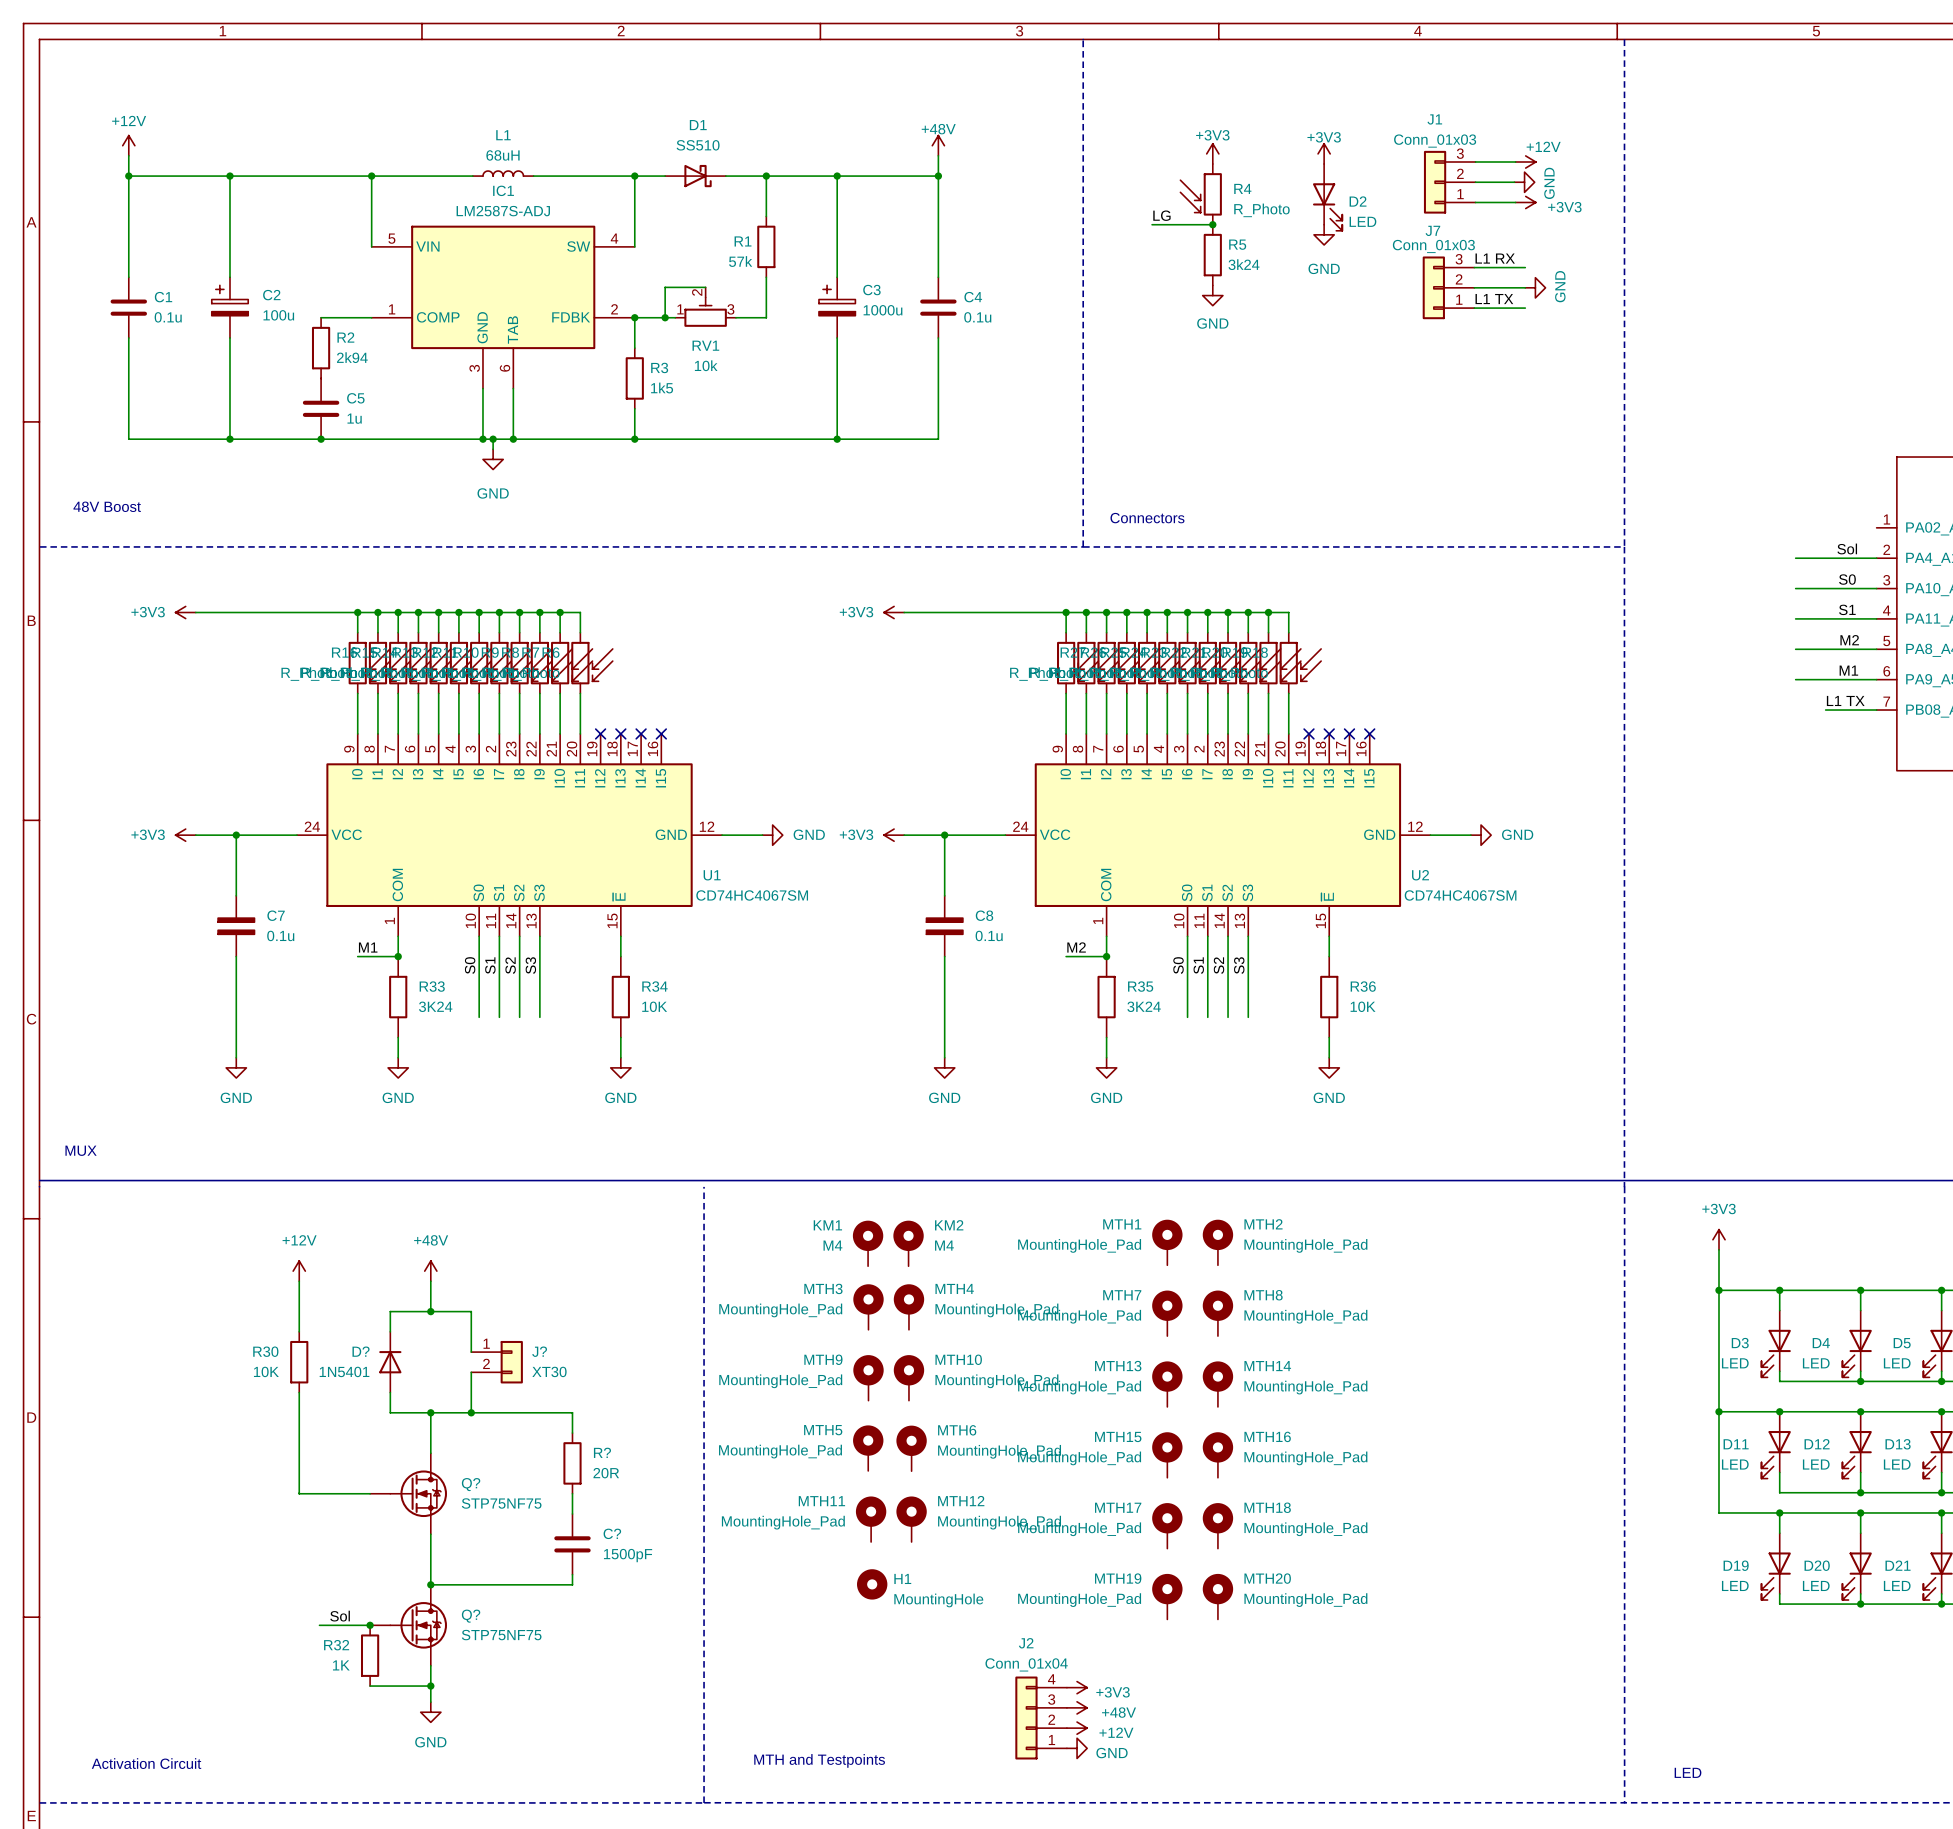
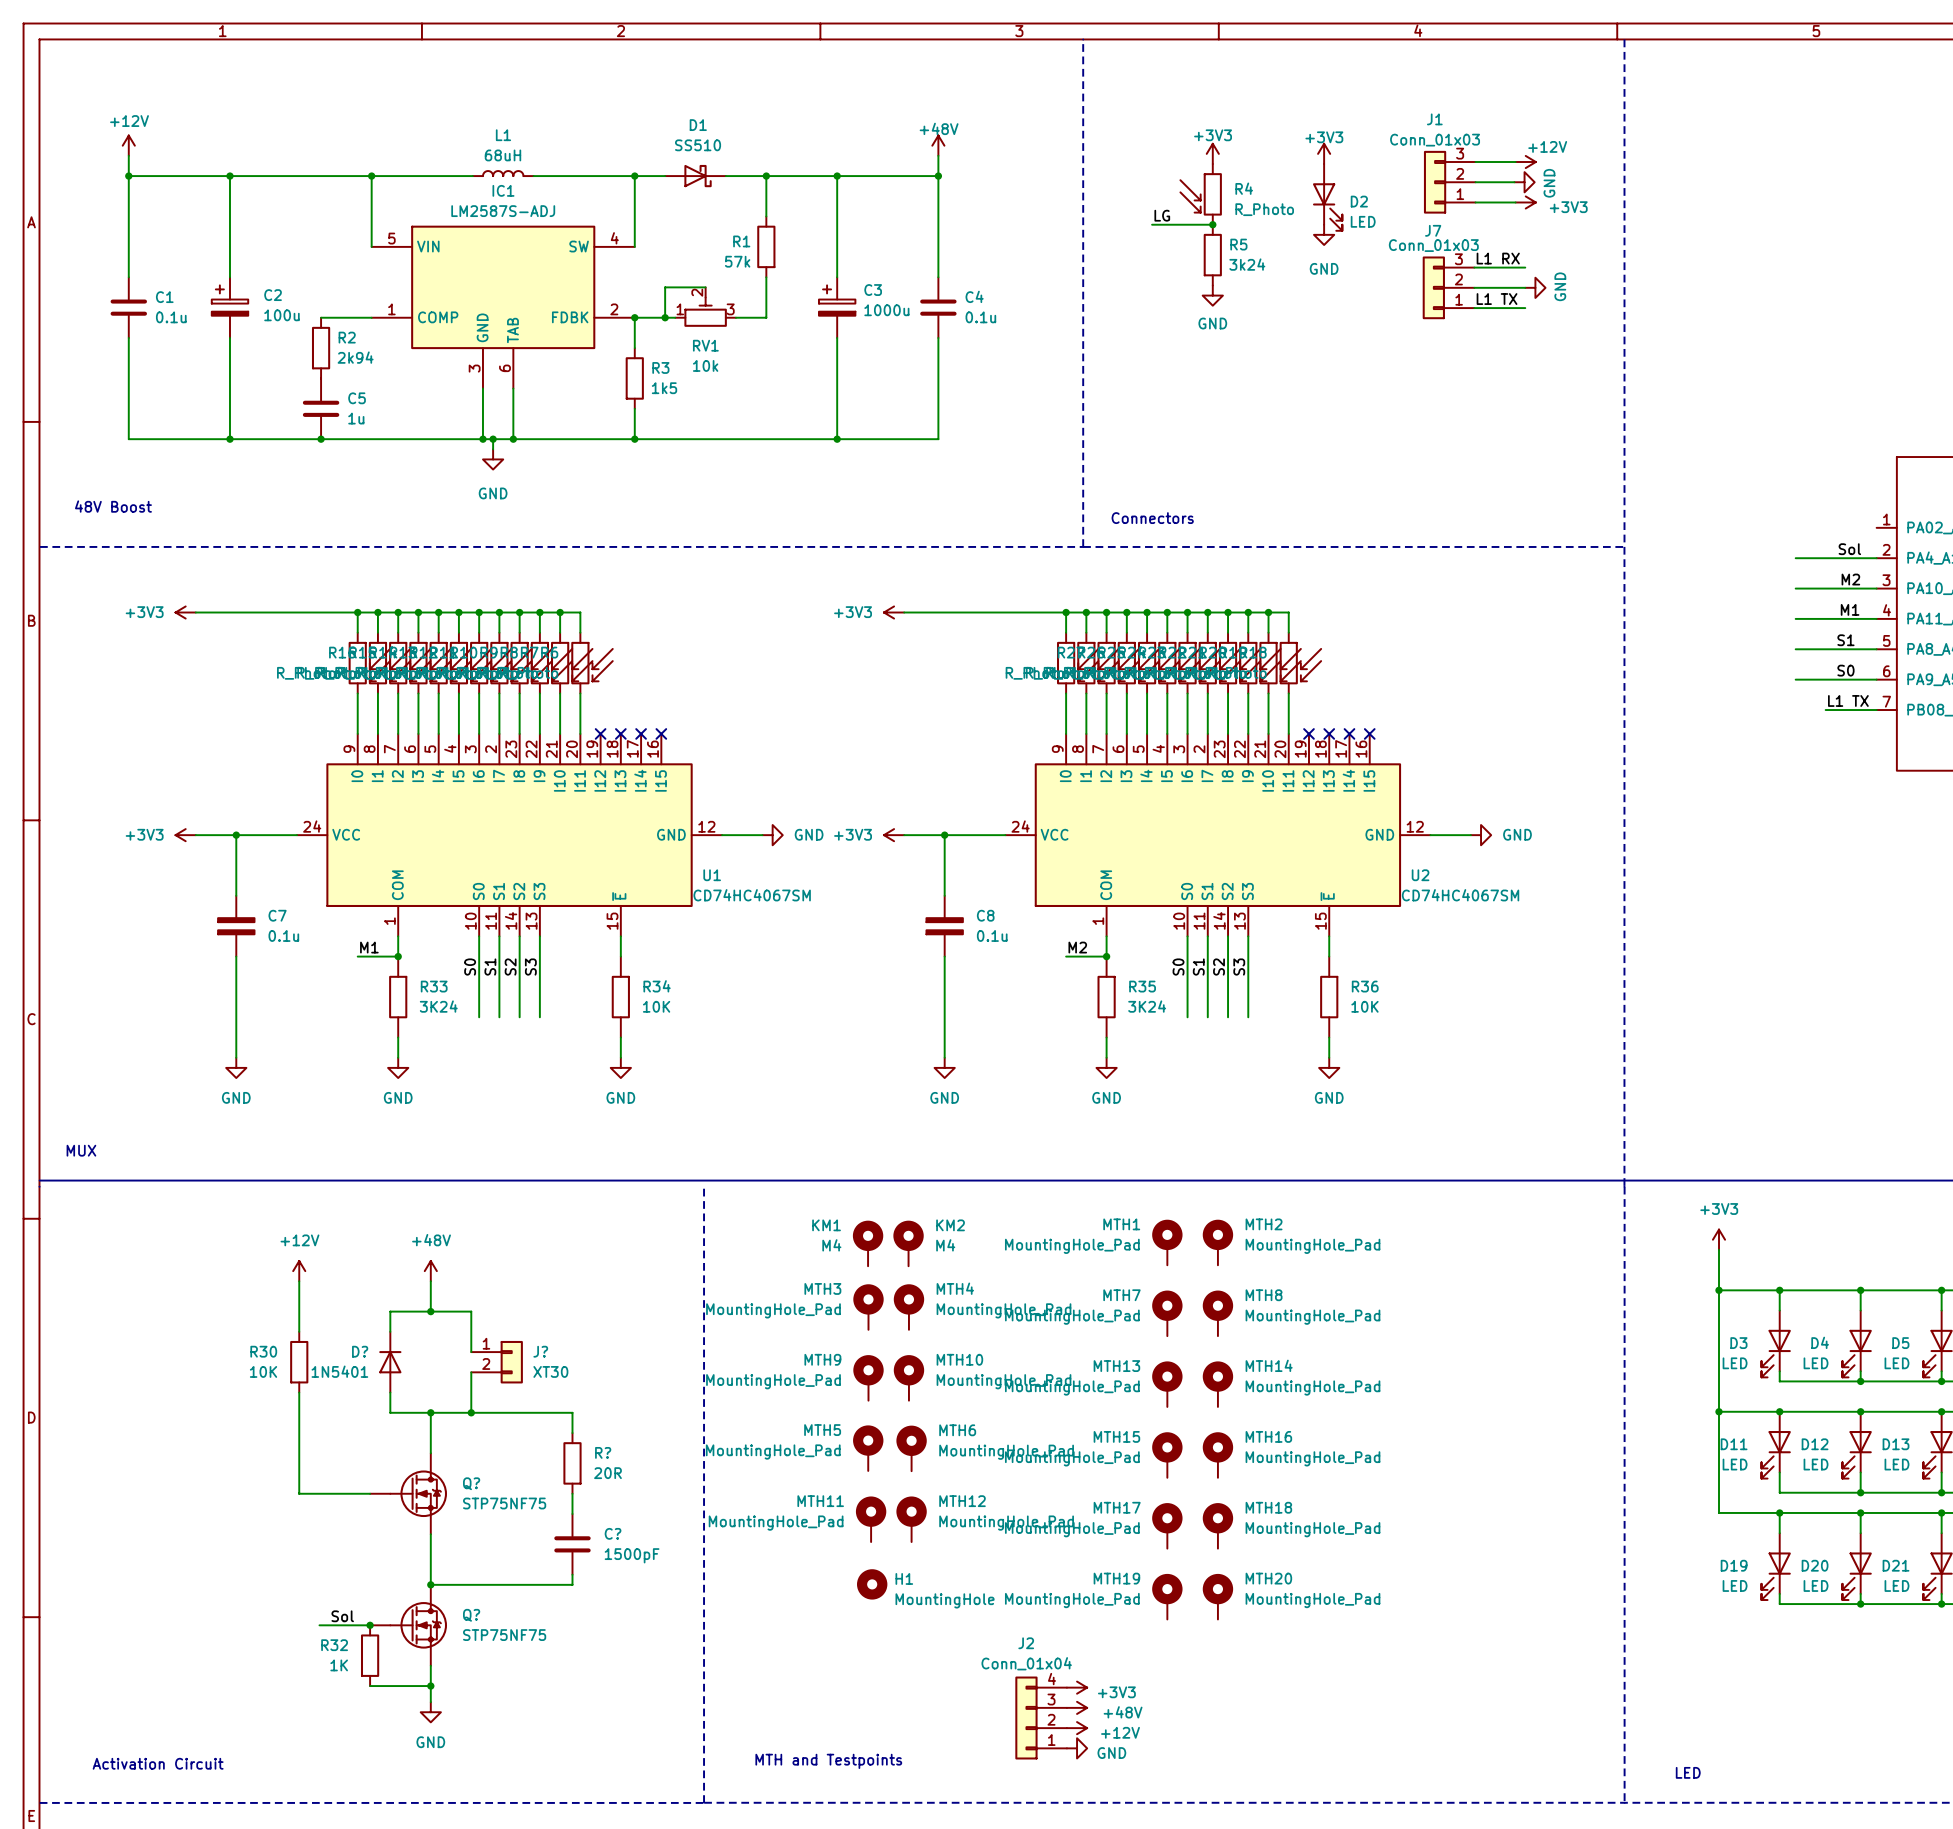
label position: S0 (1847, 579) -> S0 (1845, 670)
label position: S1 (1847, 609) -> S1 (1845, 640)
label position: M2 (1849, 640) -> M2 (1850, 579)
label position: M1 (1848, 670) -> M1 (1850, 609)

